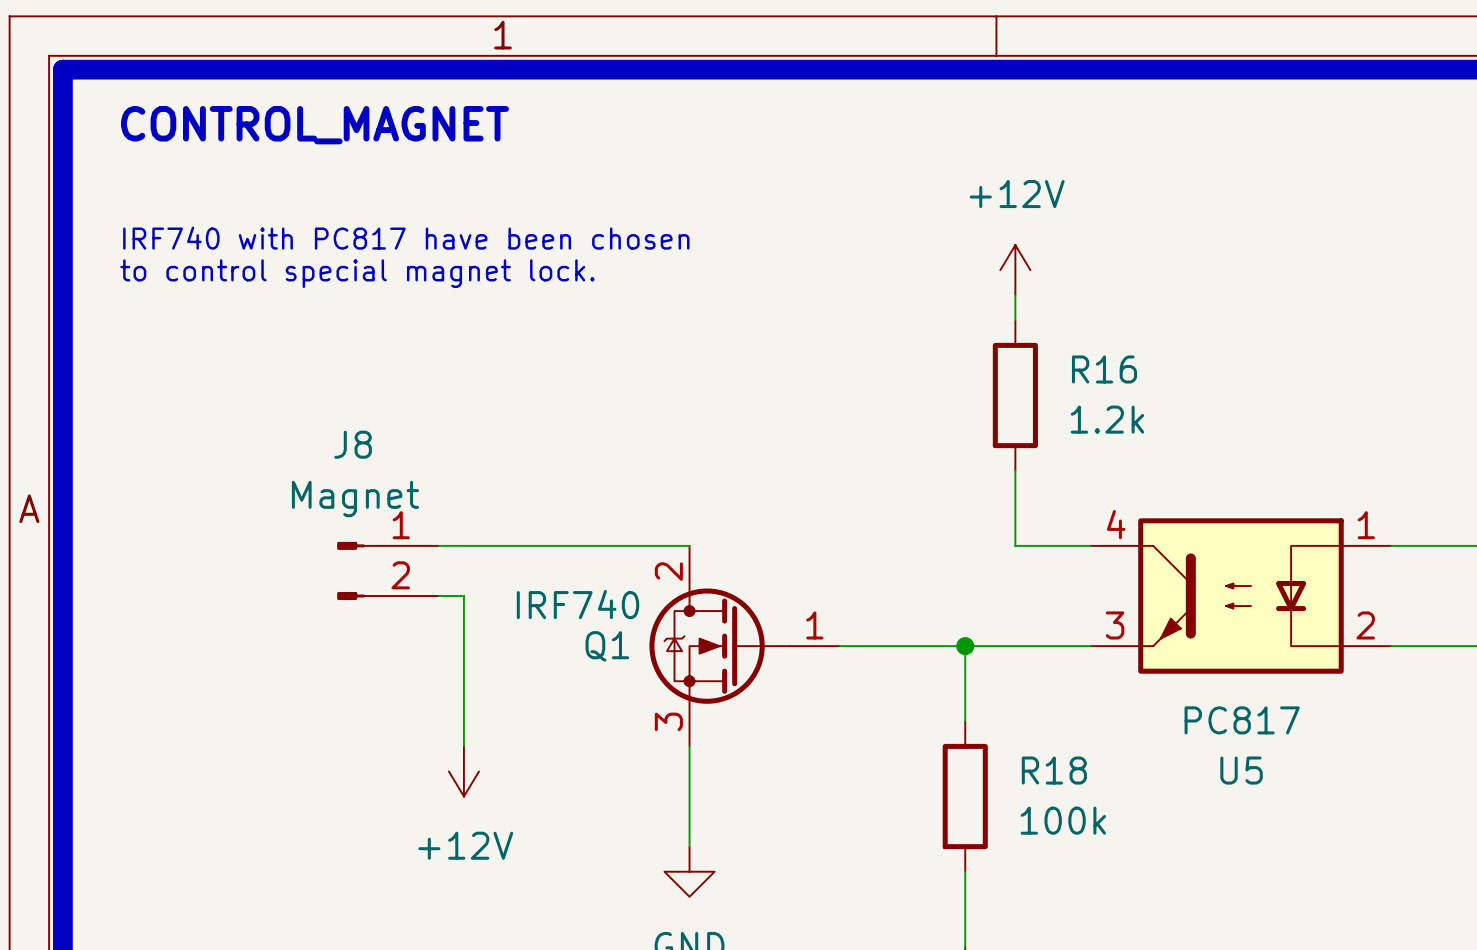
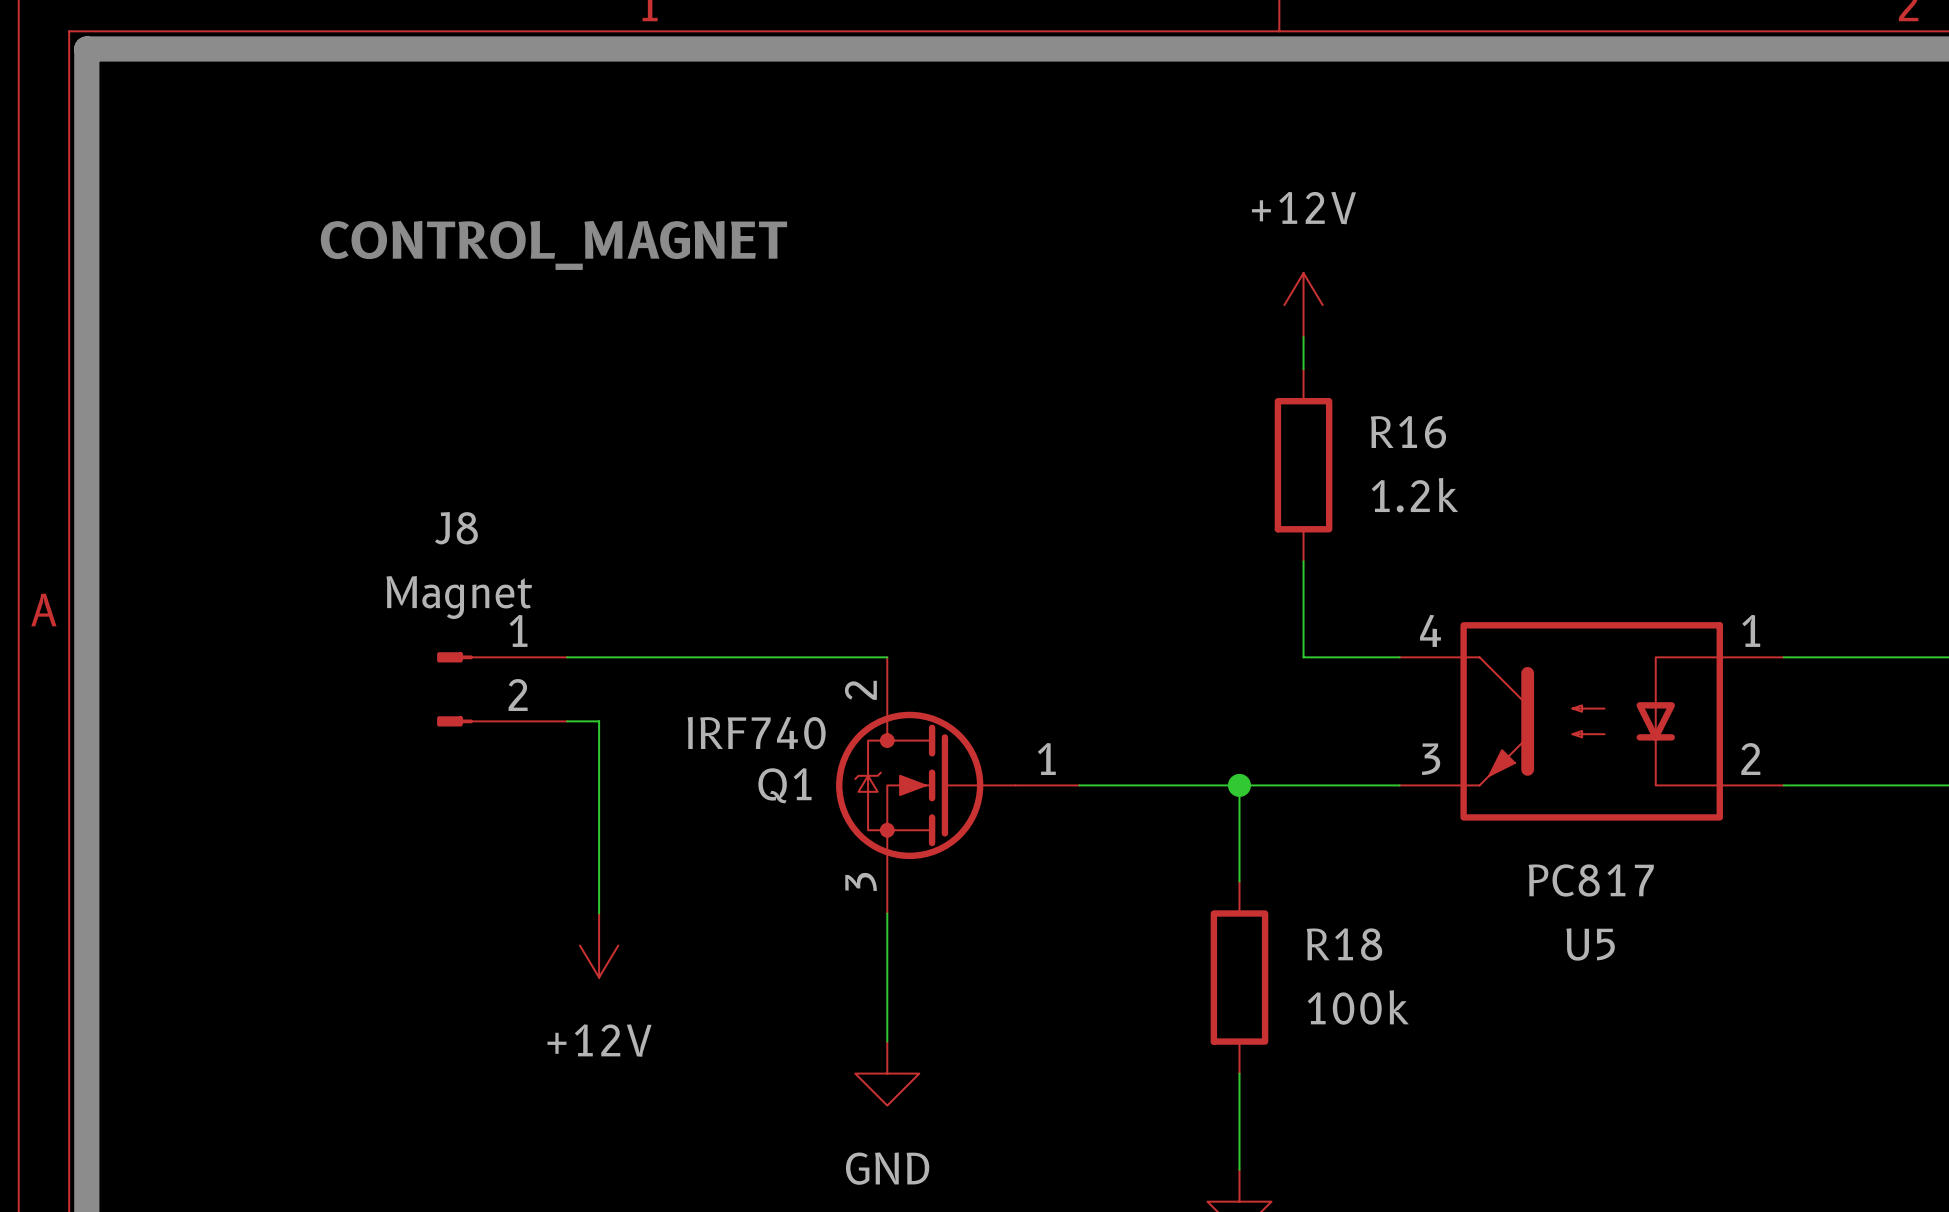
text position: CONTROL_MAGNET (314, 125) -> CONTROL_MAGNET (553, 245)
text: IRF740 with PC817 have been chosen (406, 238) -> none
text: to control special magnet lock. (357, 273) -> none

